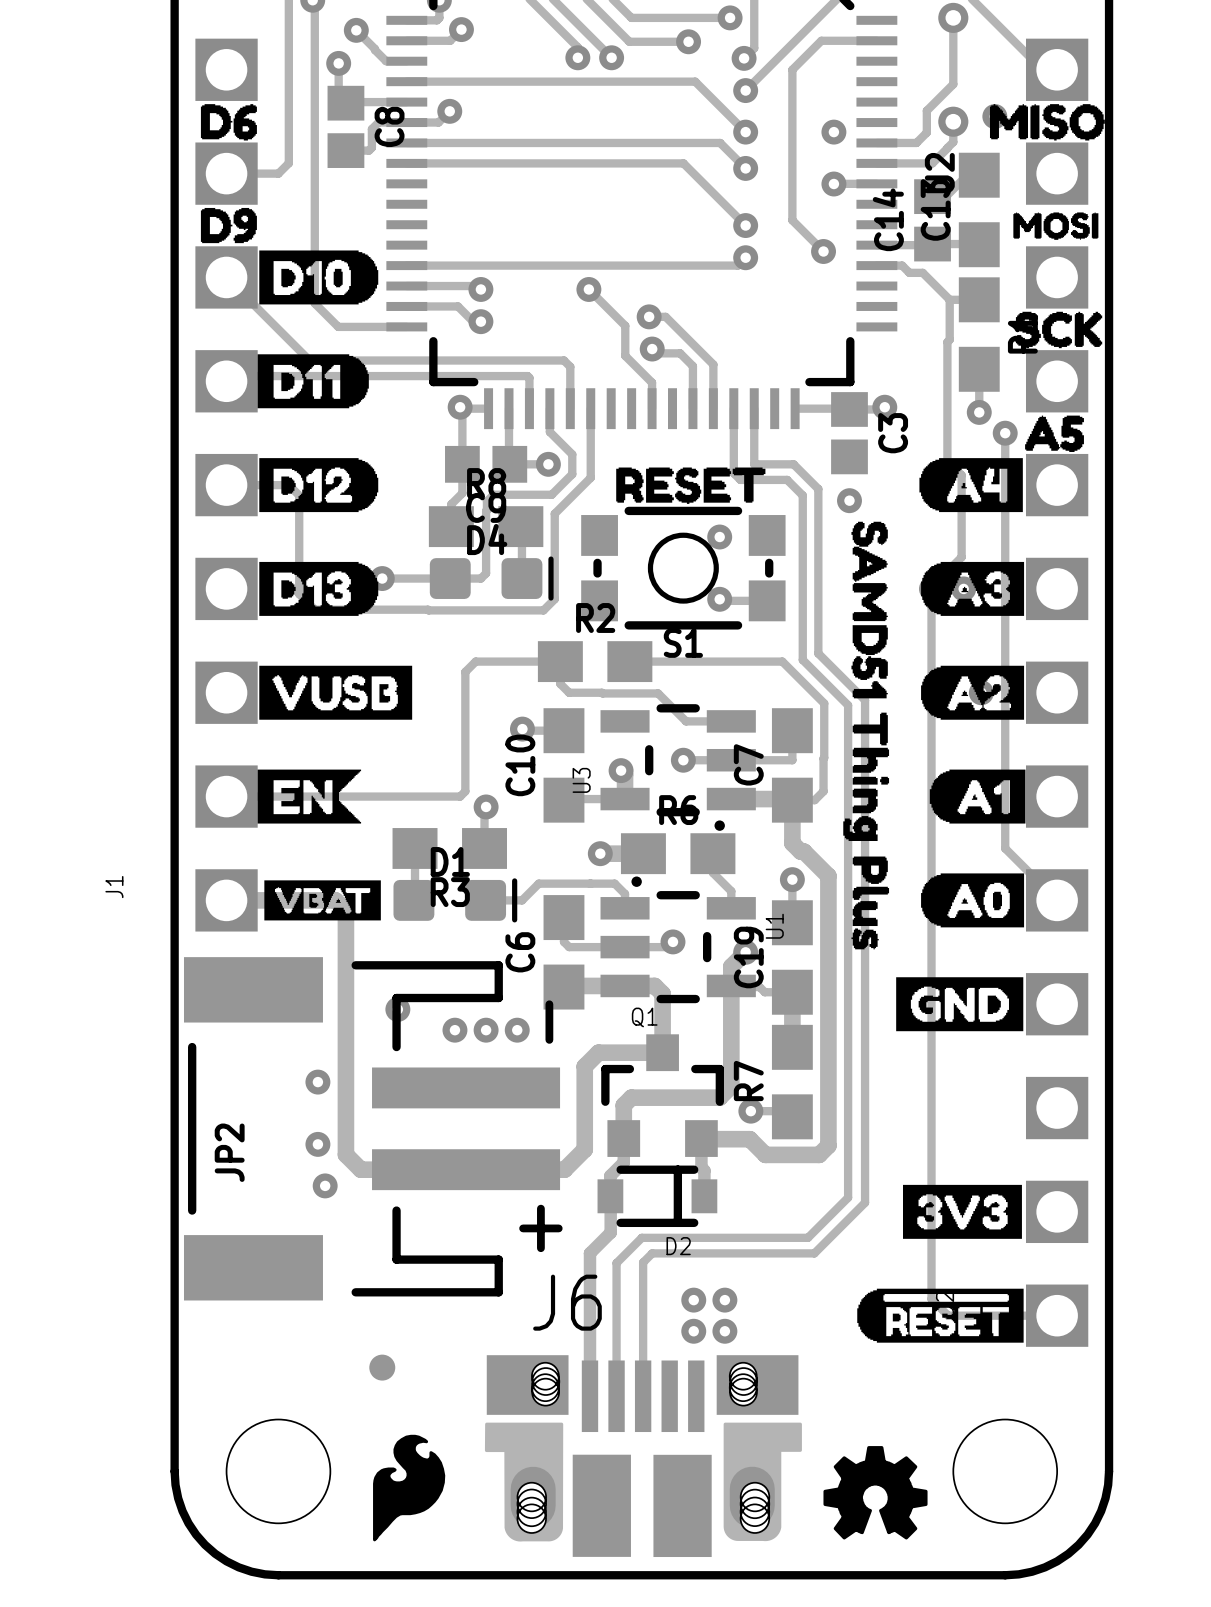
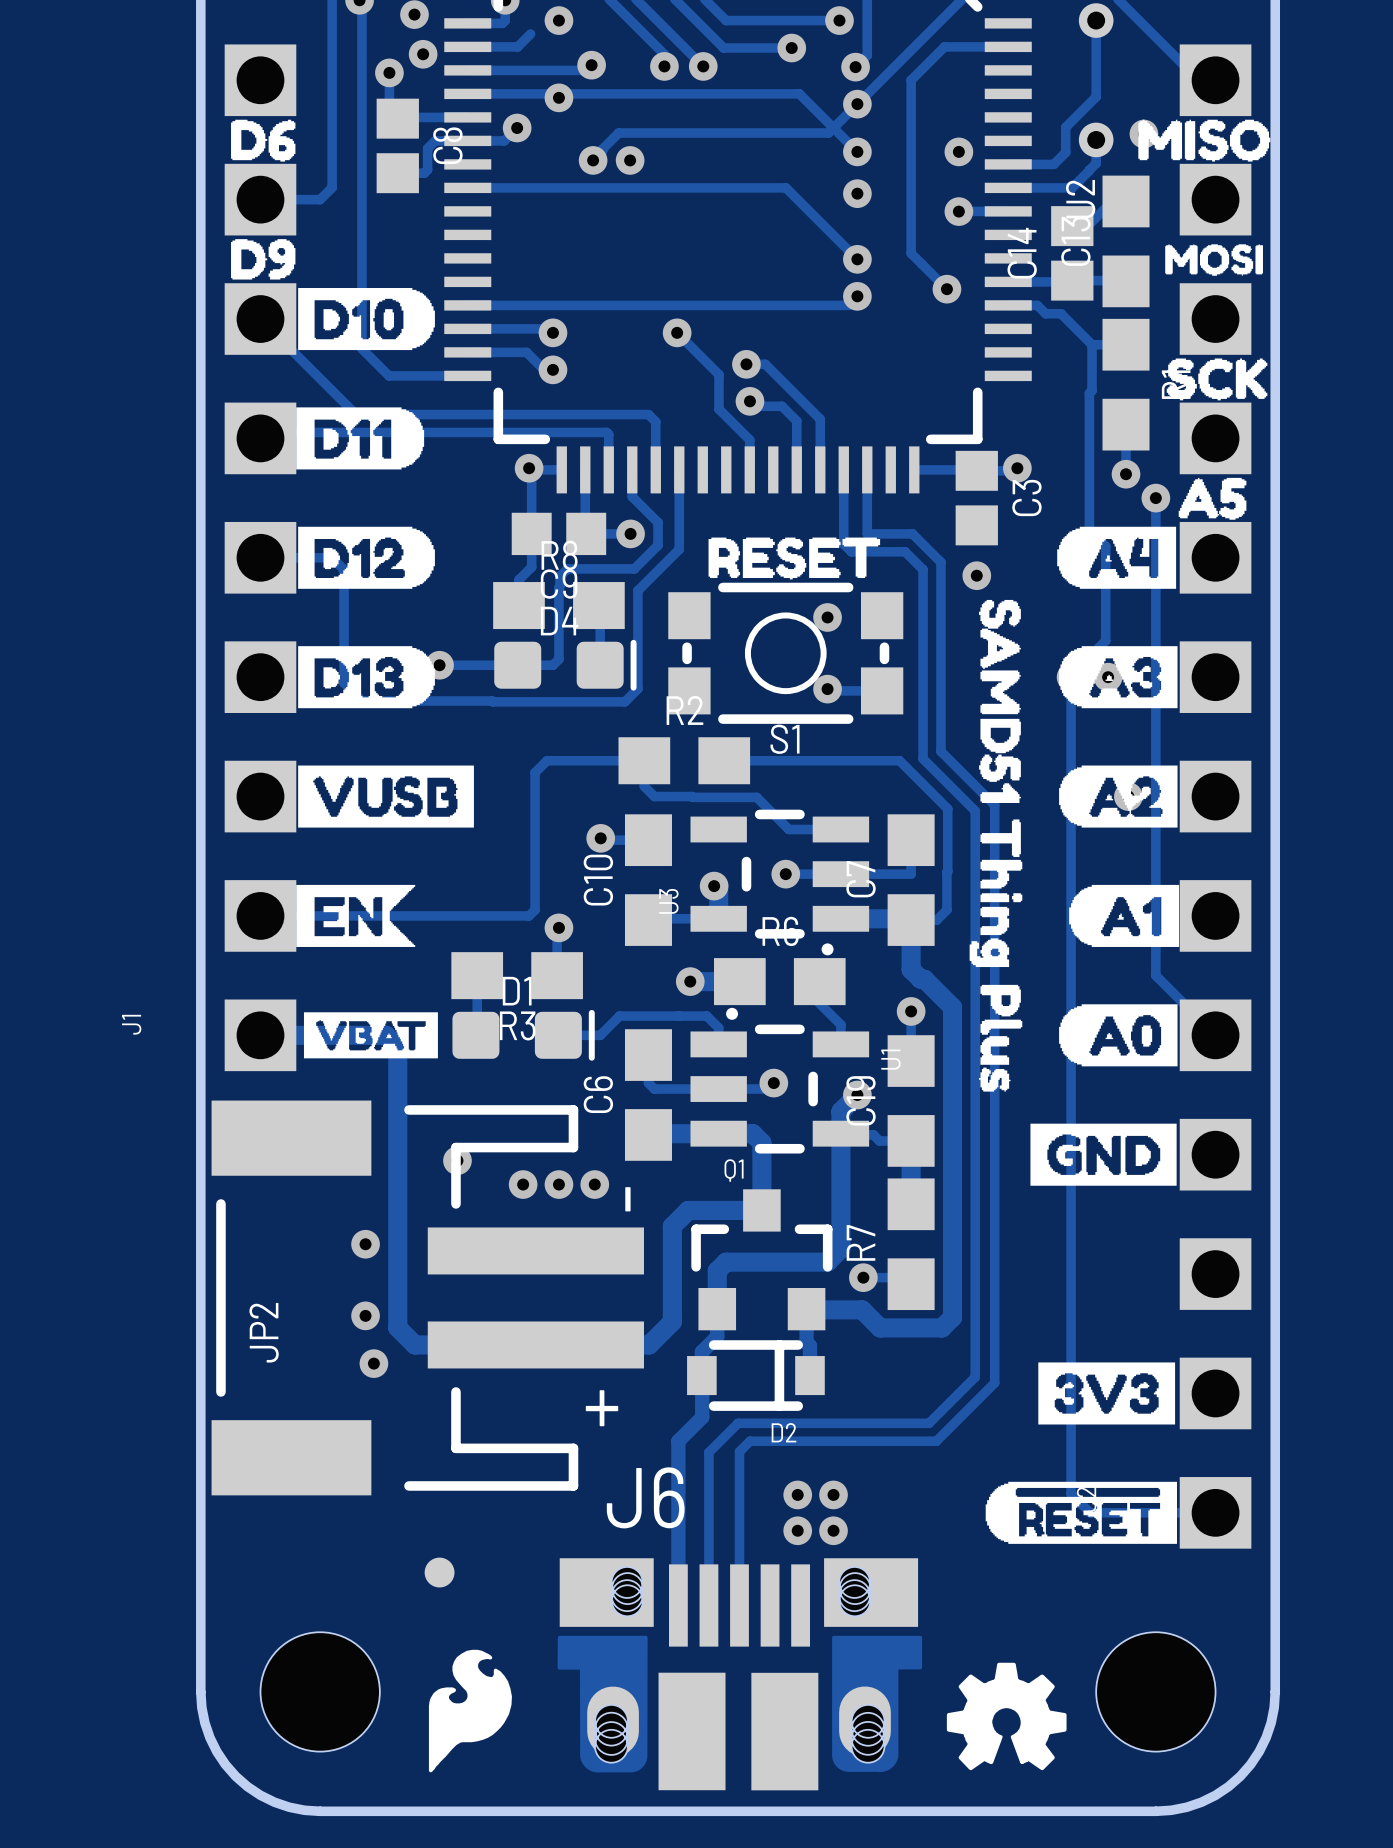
via: none -> (414, 14)
via position: (461, 29) -> (558, 20)
track: (356, 30) (386, 61) (406, 61) -> (591, 65) (586, 70) (467, 70)
via: (356, 30) -> none
via: none -> (423, 54)
via: none -> (591, 65)
via: none -> (558, 97)
track: none -> (857, 104) (828, 132) (618, 132) (593, 160)
via: none -> (593, 160)
via: none -> (630, 160)
track: (406, 142) (720, 142) (745, 168) -> none

